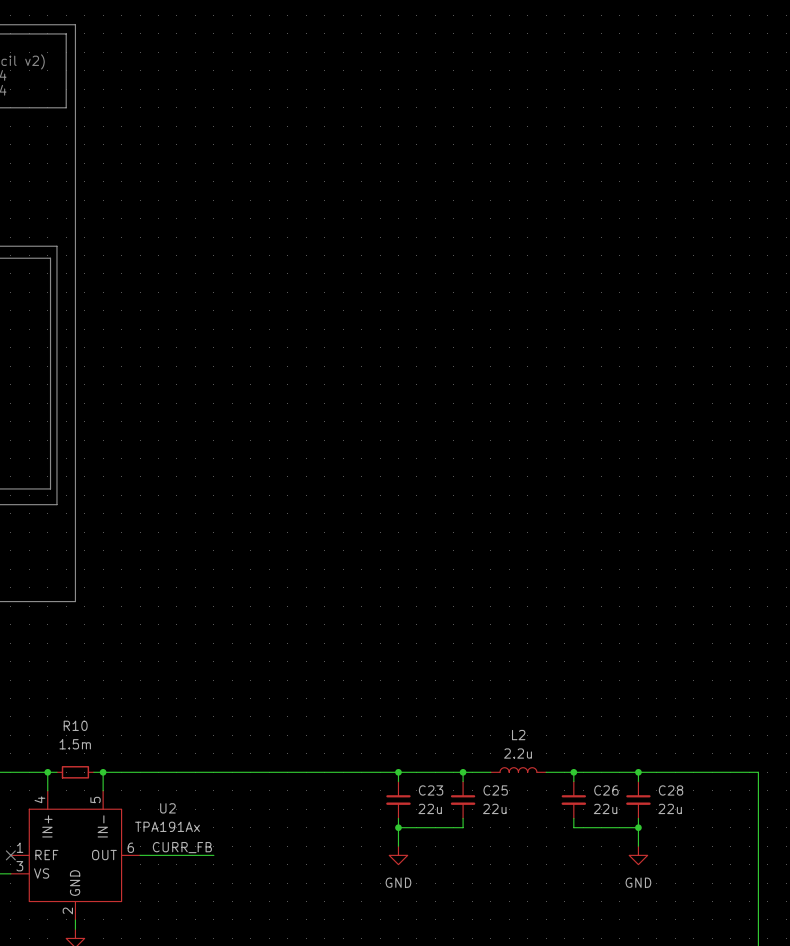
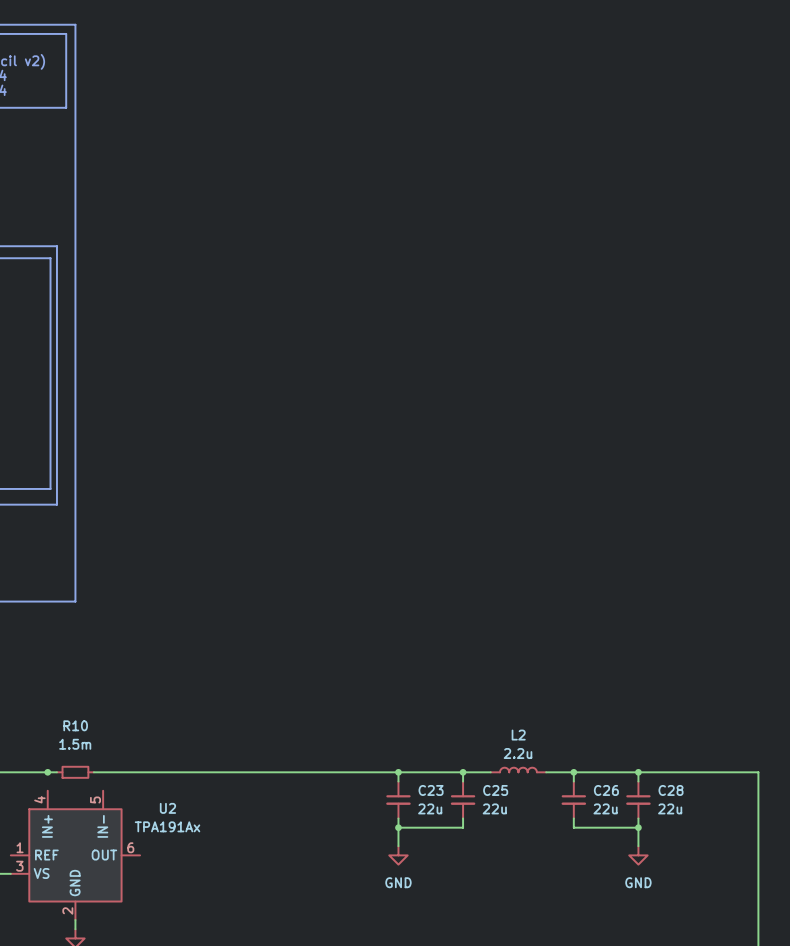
wire: (47, 772) (47, 790) -> none
wire: (103, 772) (103, 790) -> none
junction: (103, 772) -> none
label: CURR_FB (182, 847) -> none
no-connect mark: (10, 855) -> none
wire: (140, 855) (213, 855) -> none

